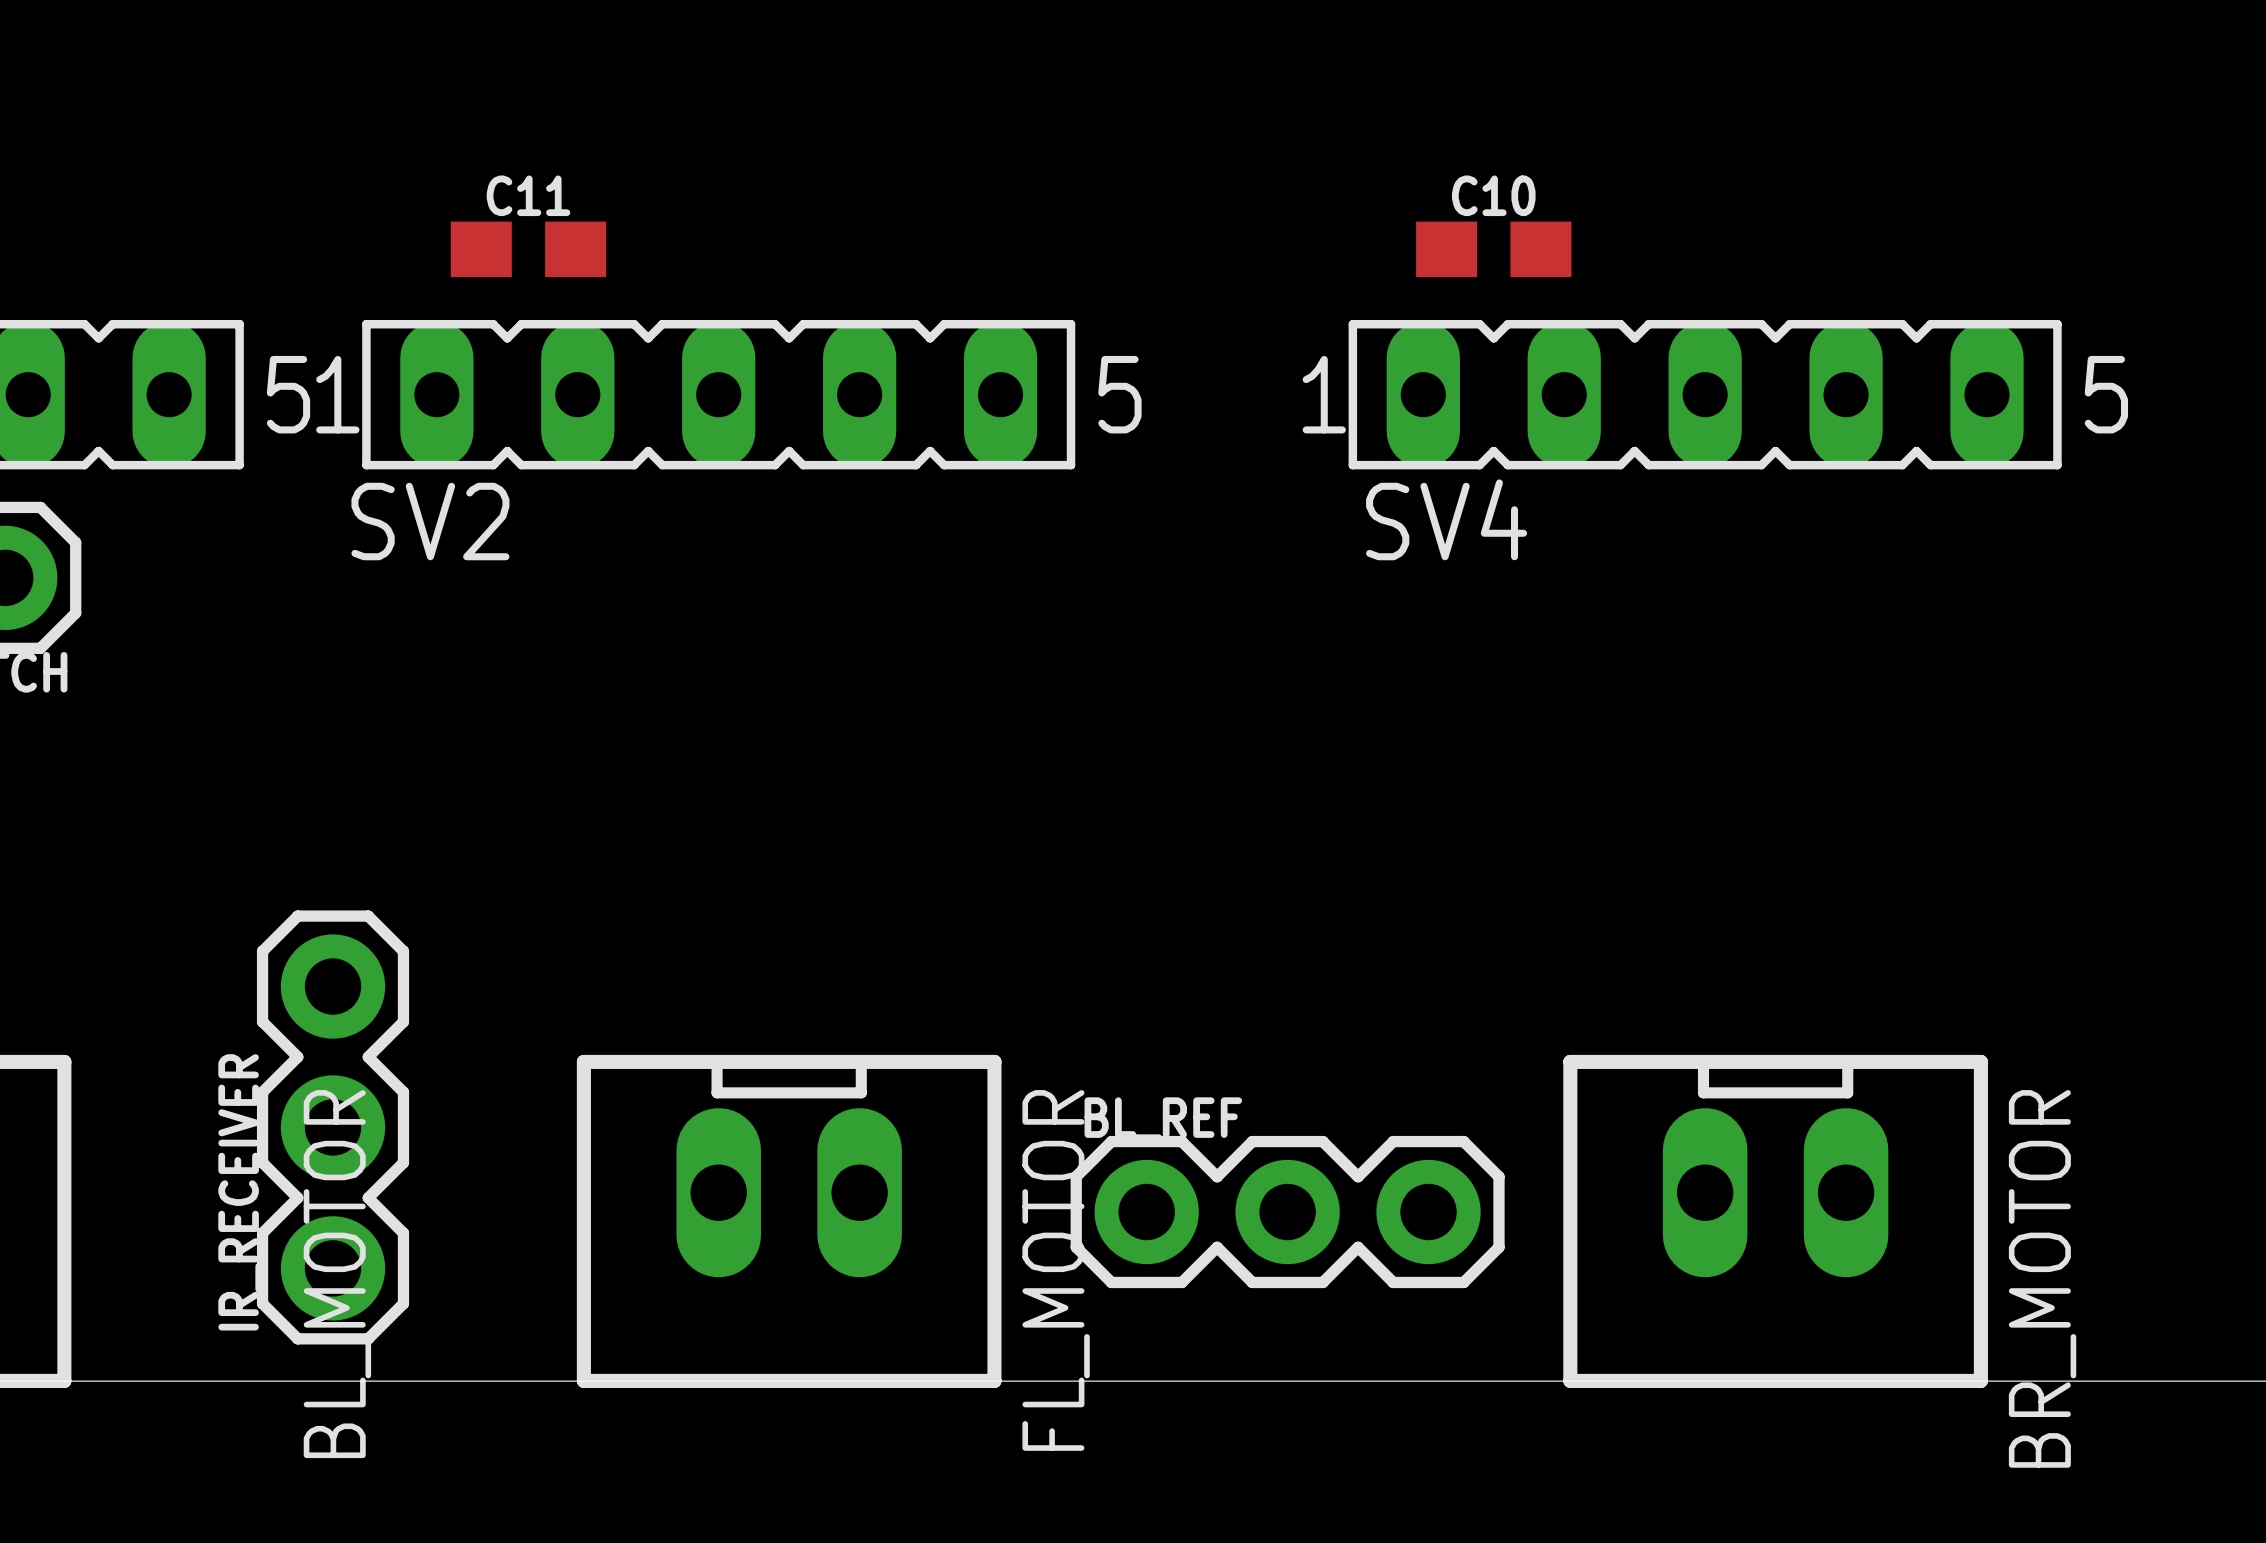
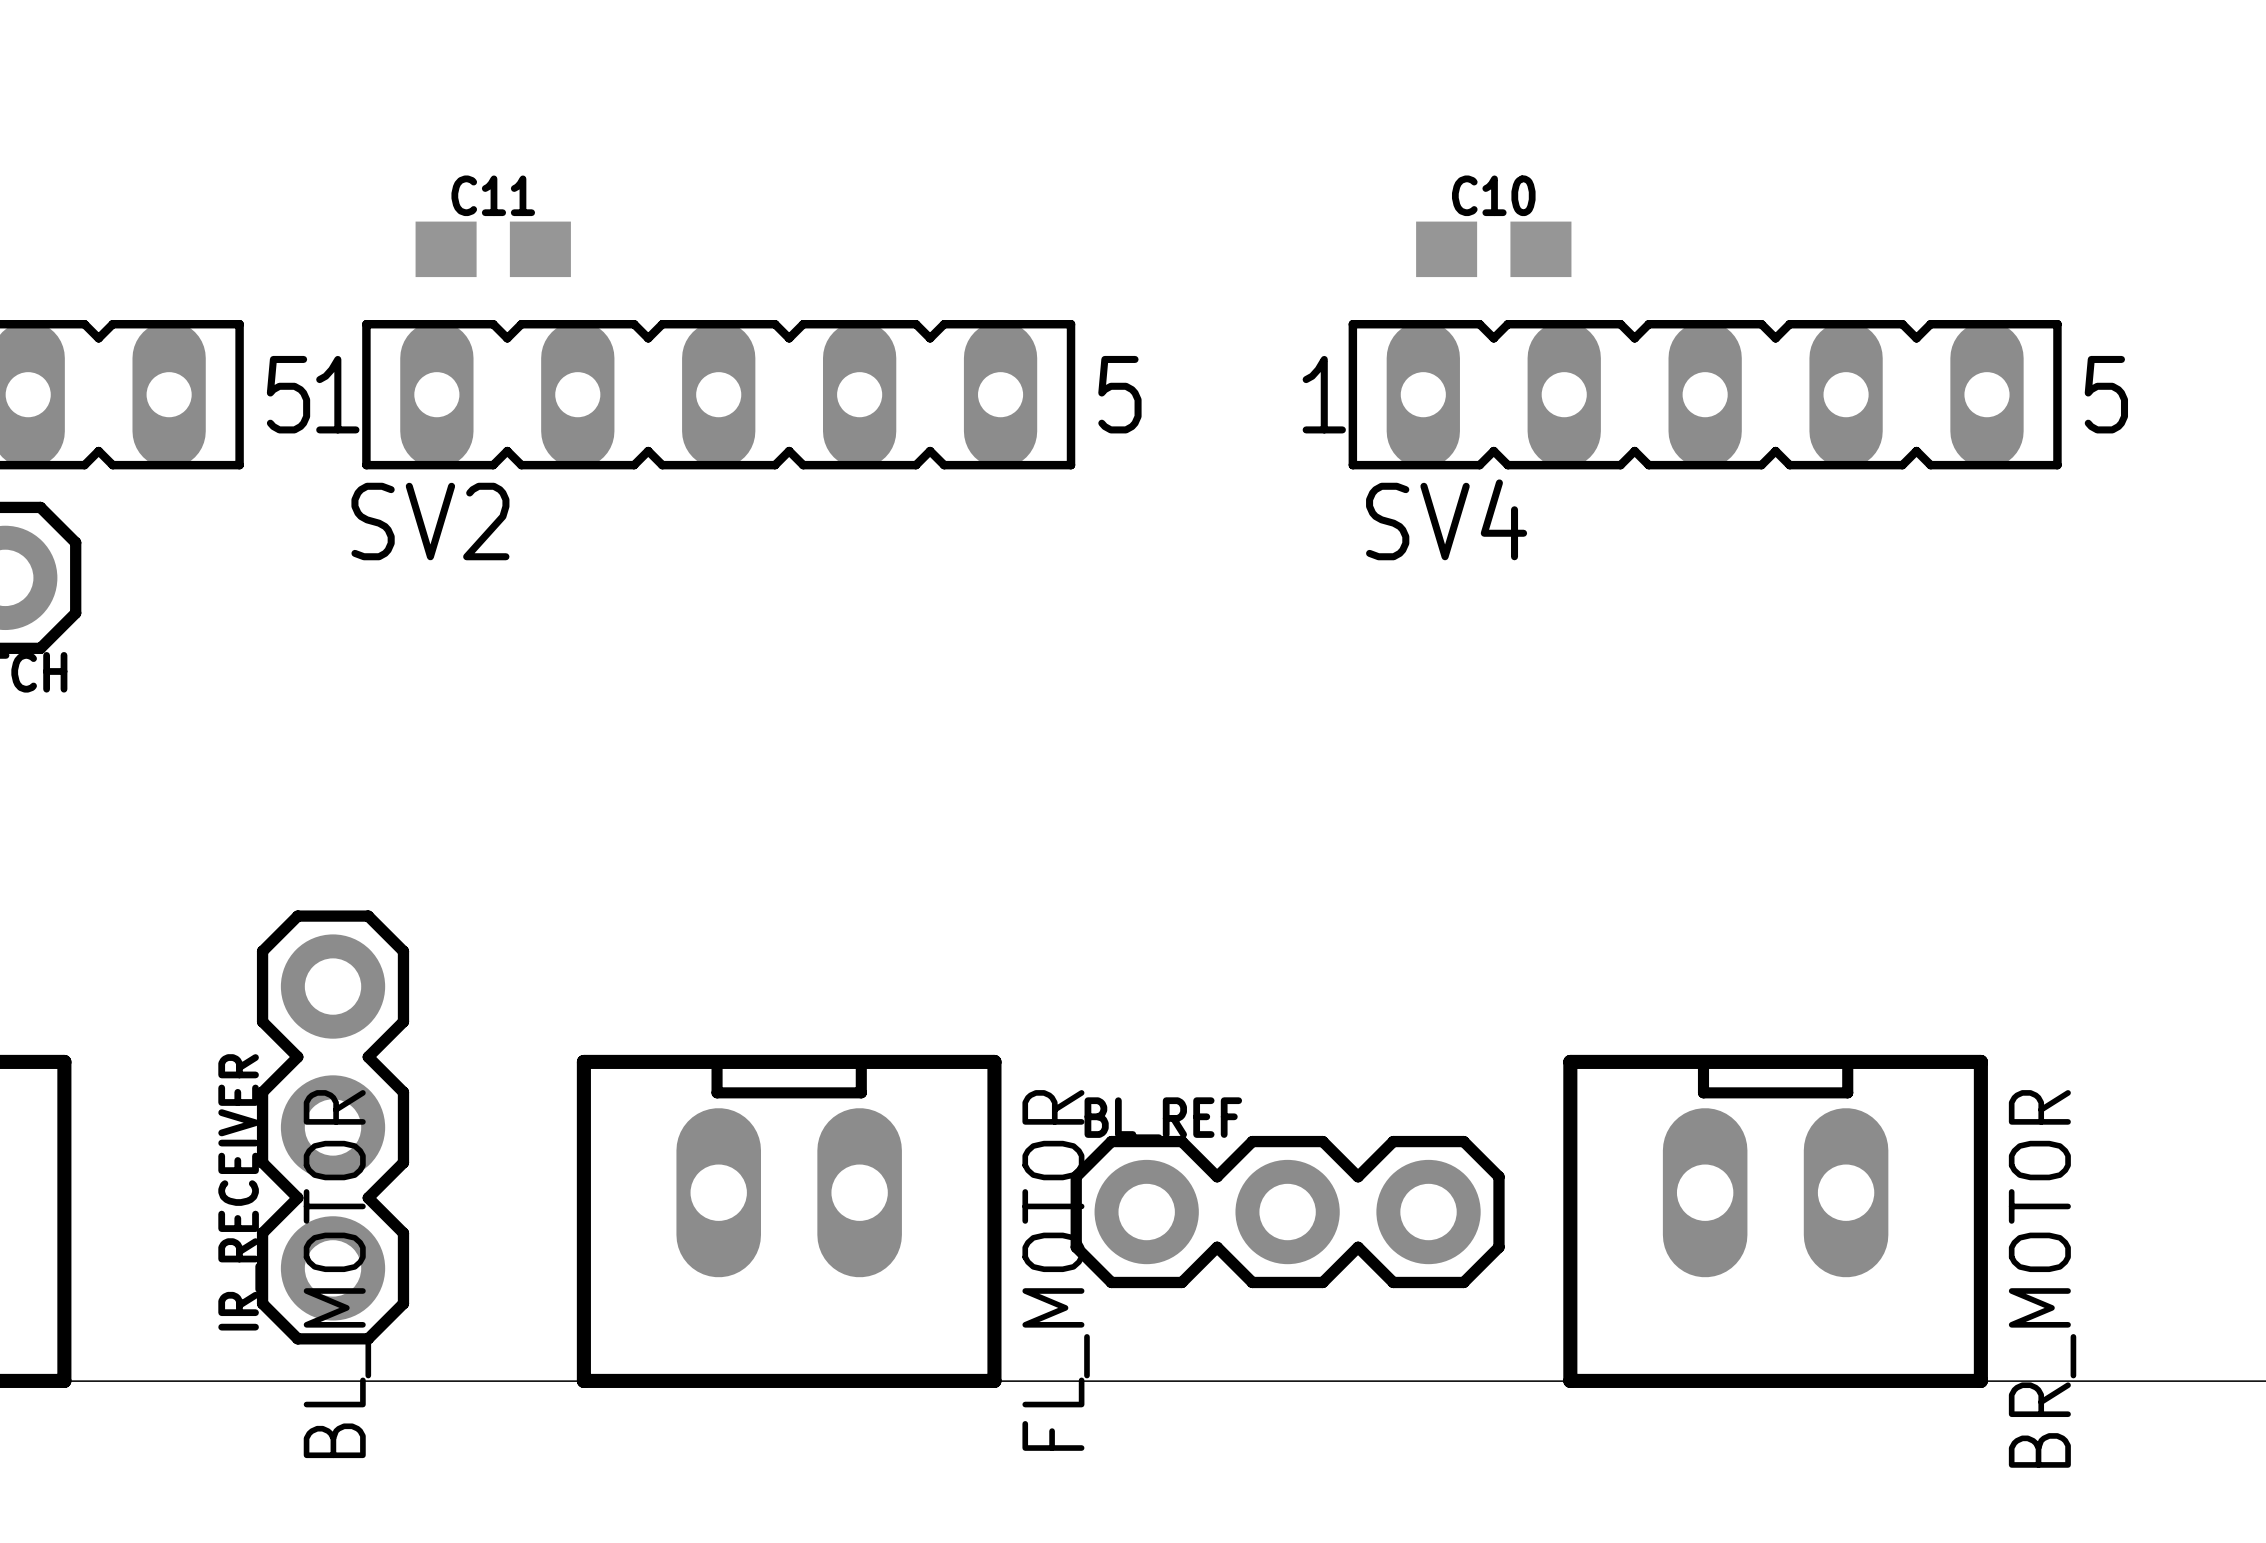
C11 position: (528, 249) -> (493, 249)

